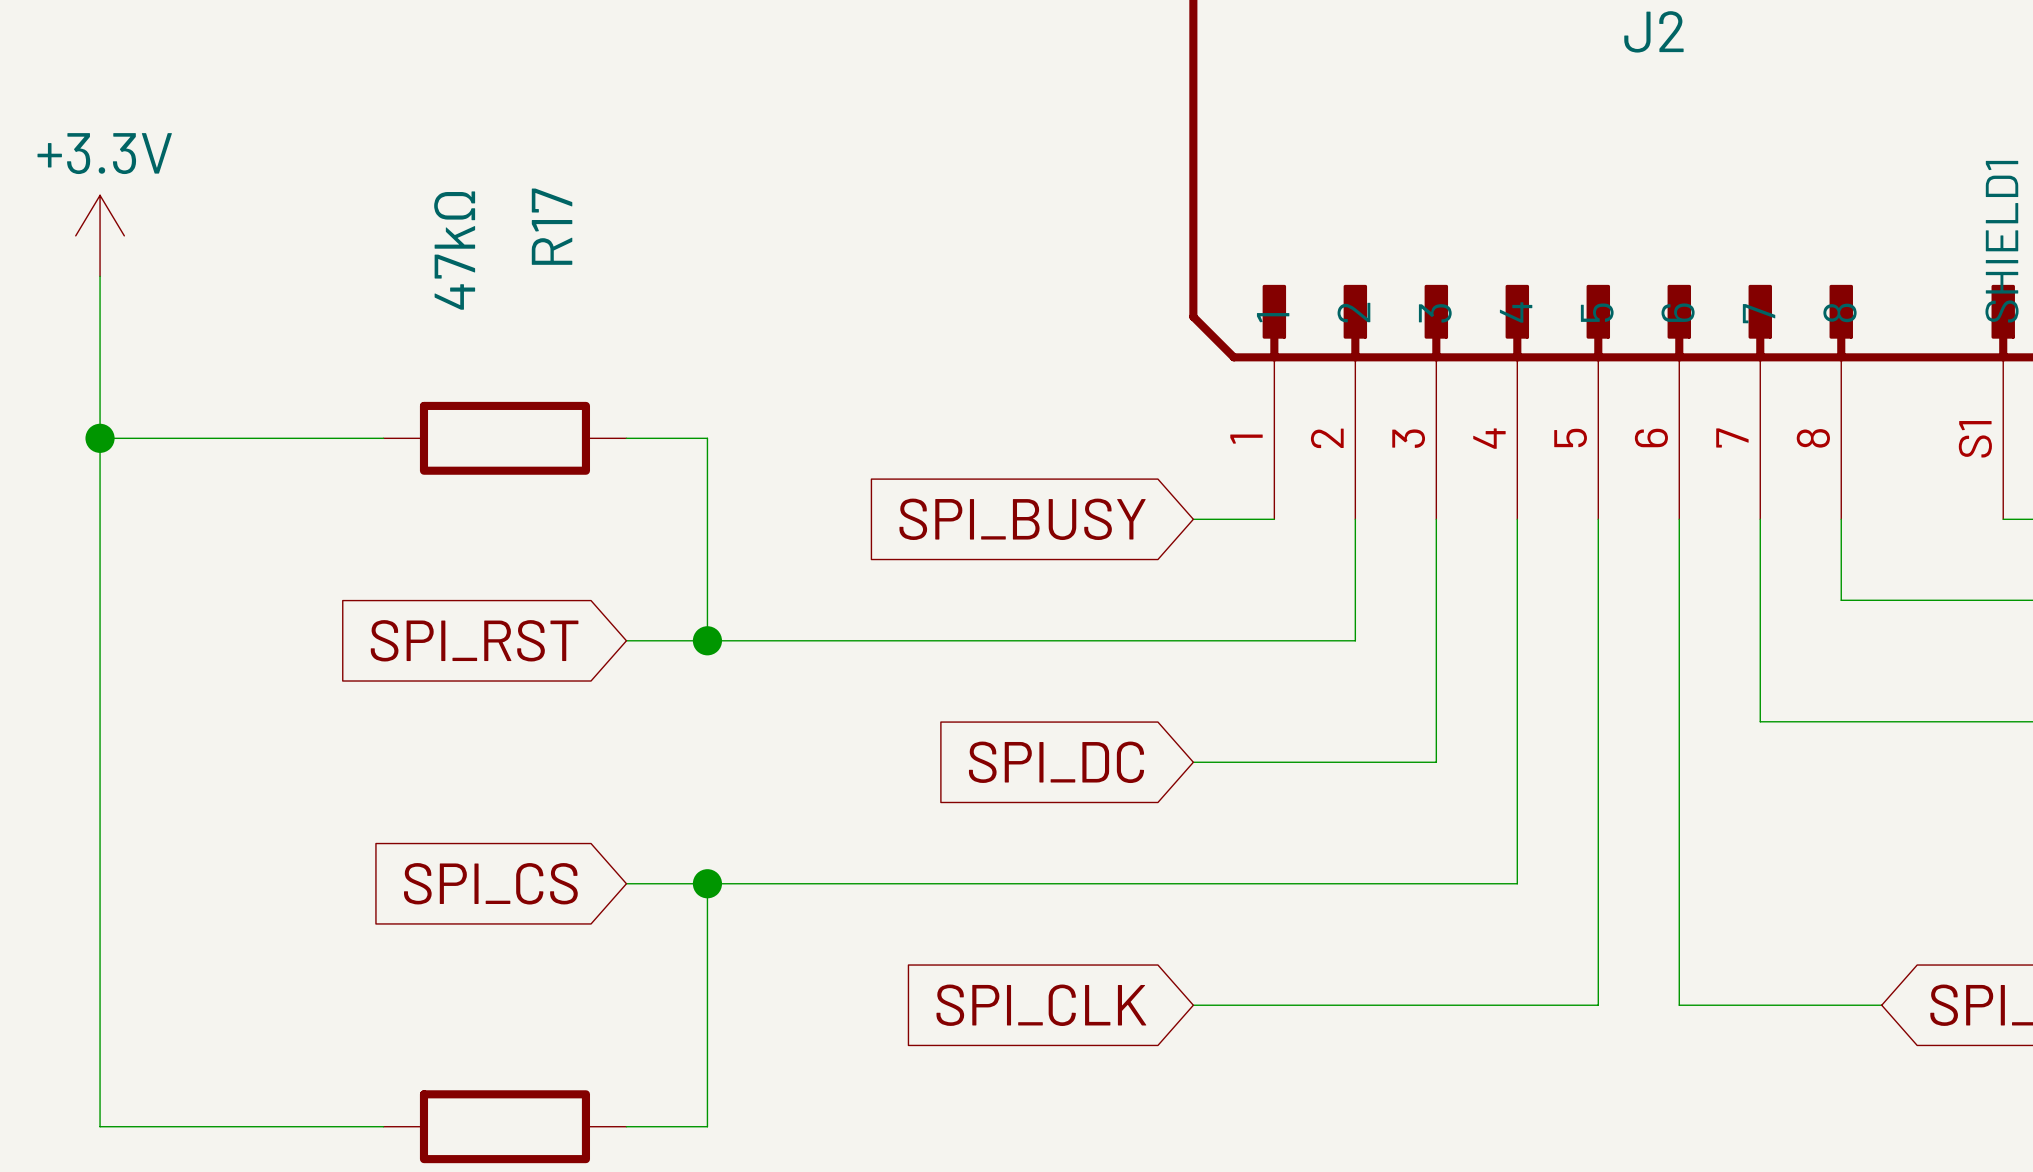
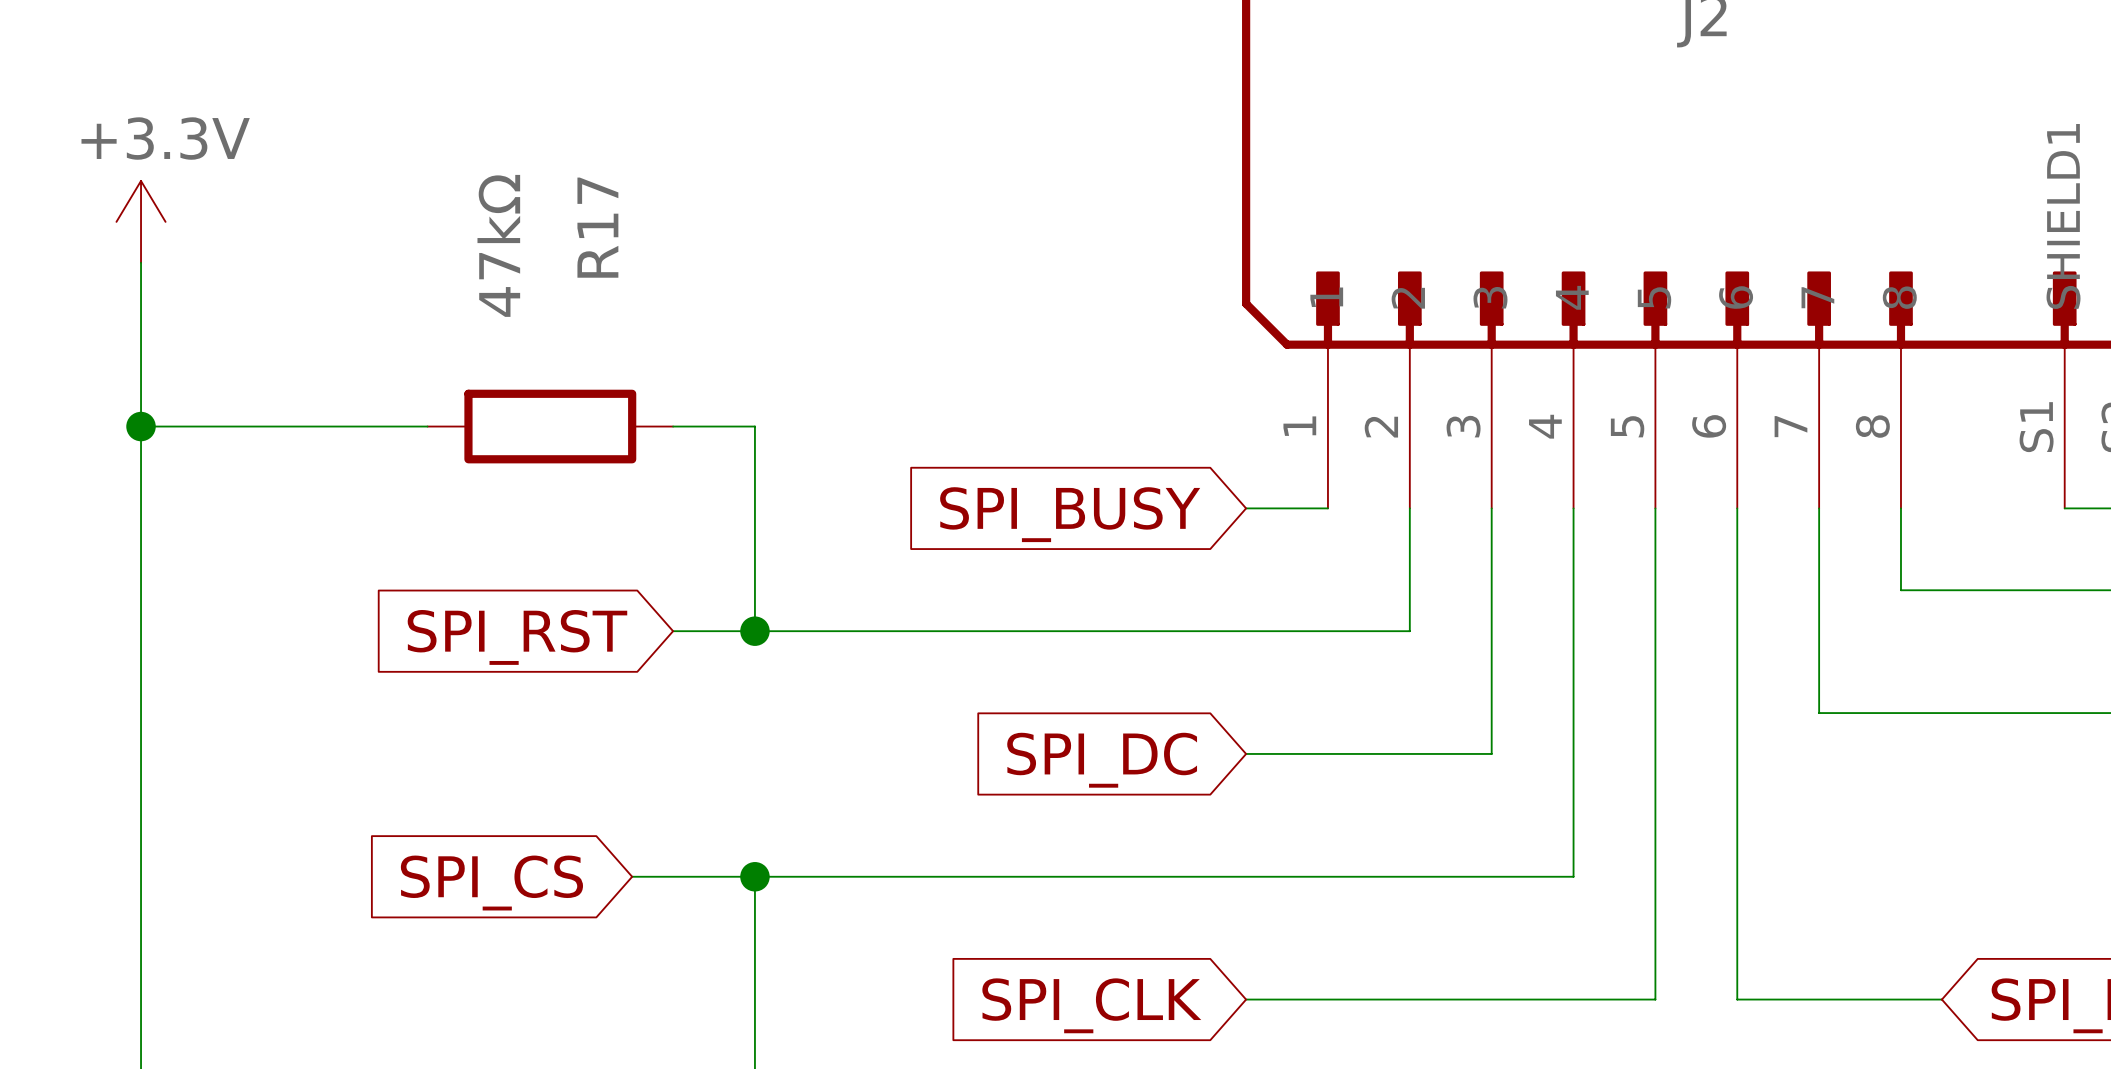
global label position: SPI_CS (490, 883) -> SPI_CS (491, 883)
wire: none -> (632, 876) (673, 876)

